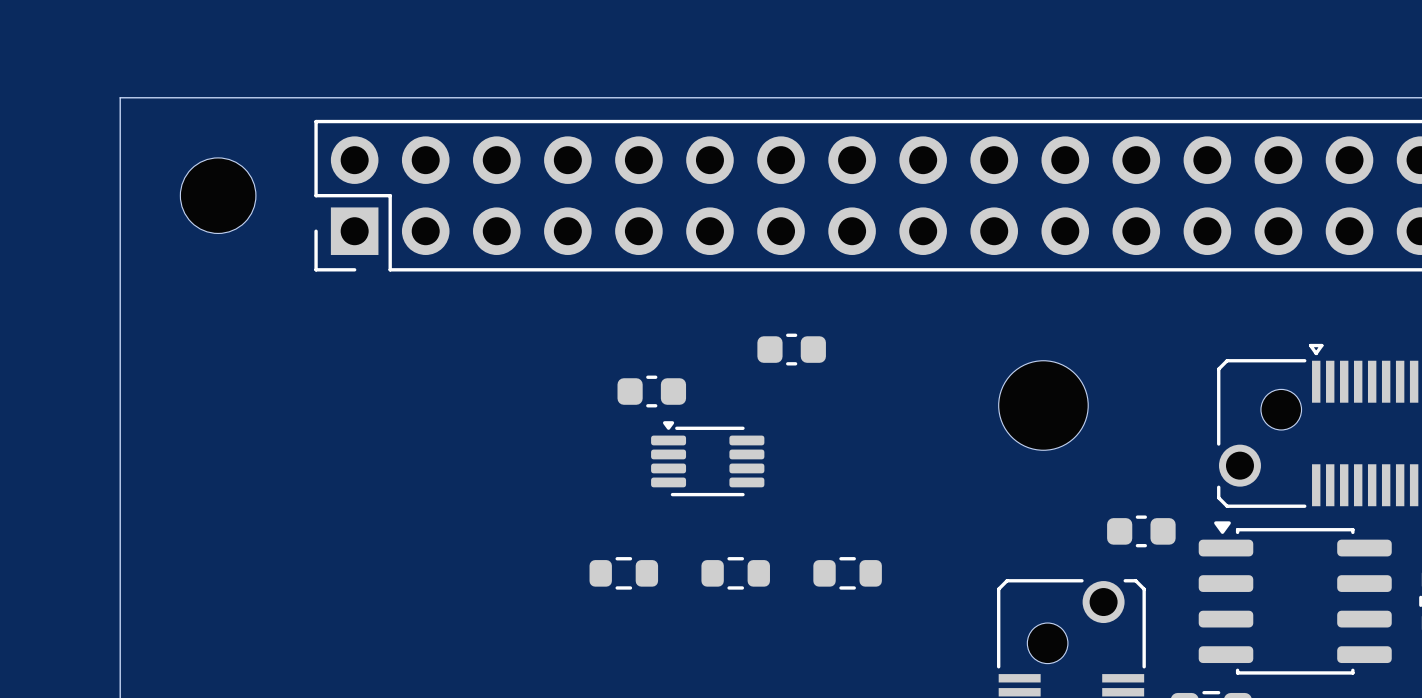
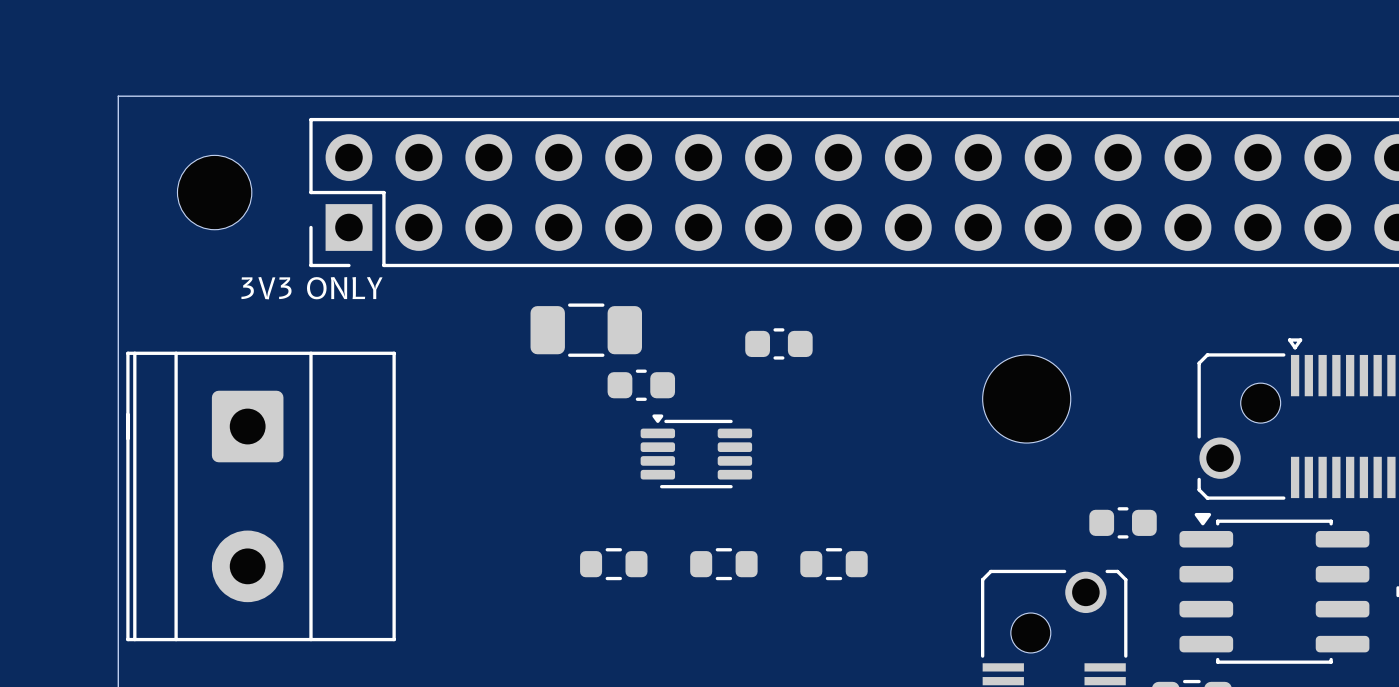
text: none -> 3V3 ONLY (312, 288)
part: none -> (586, 330)
part: none -> (261, 496)

